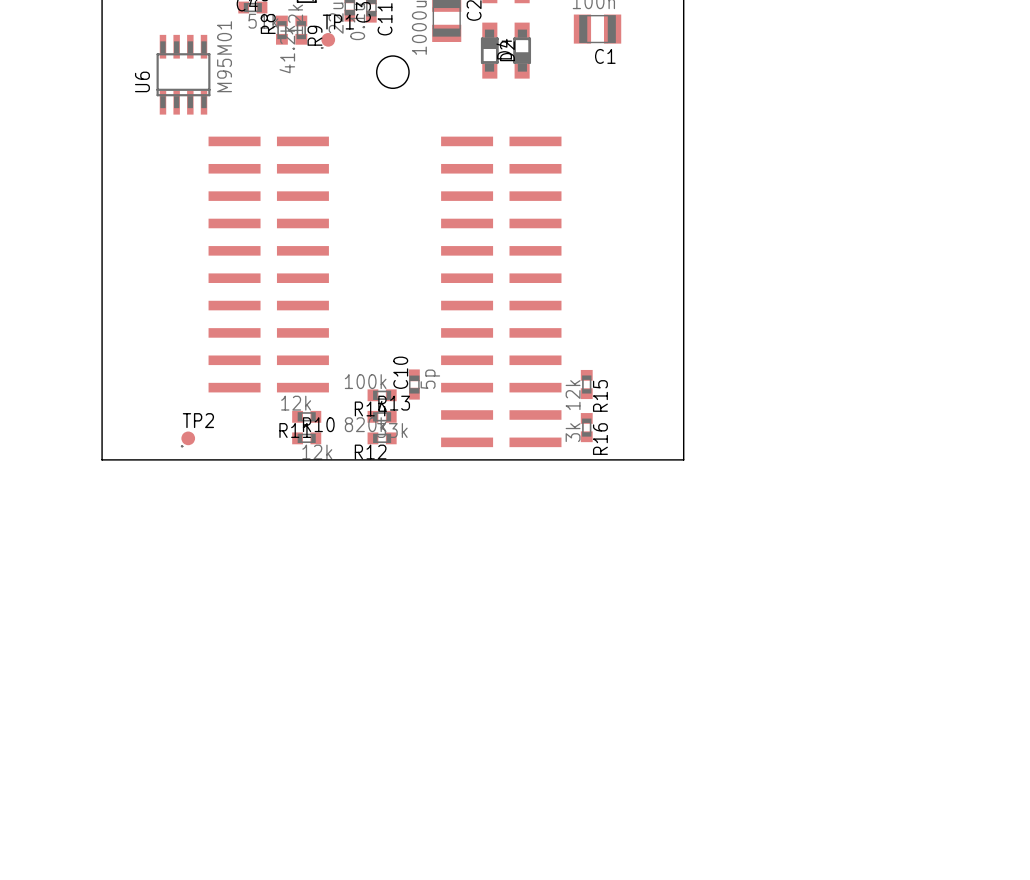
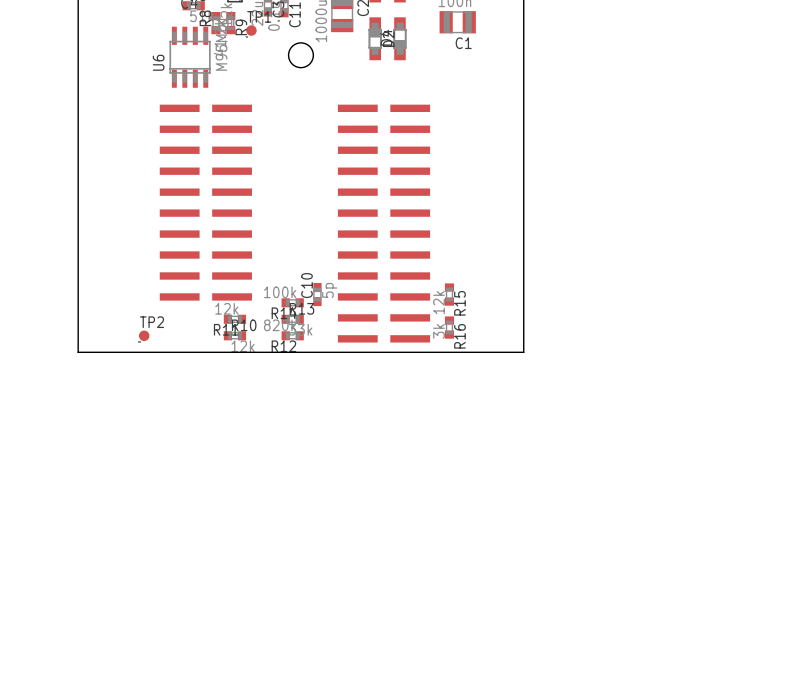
U6 position: (183, 74) -> (190, 57)

